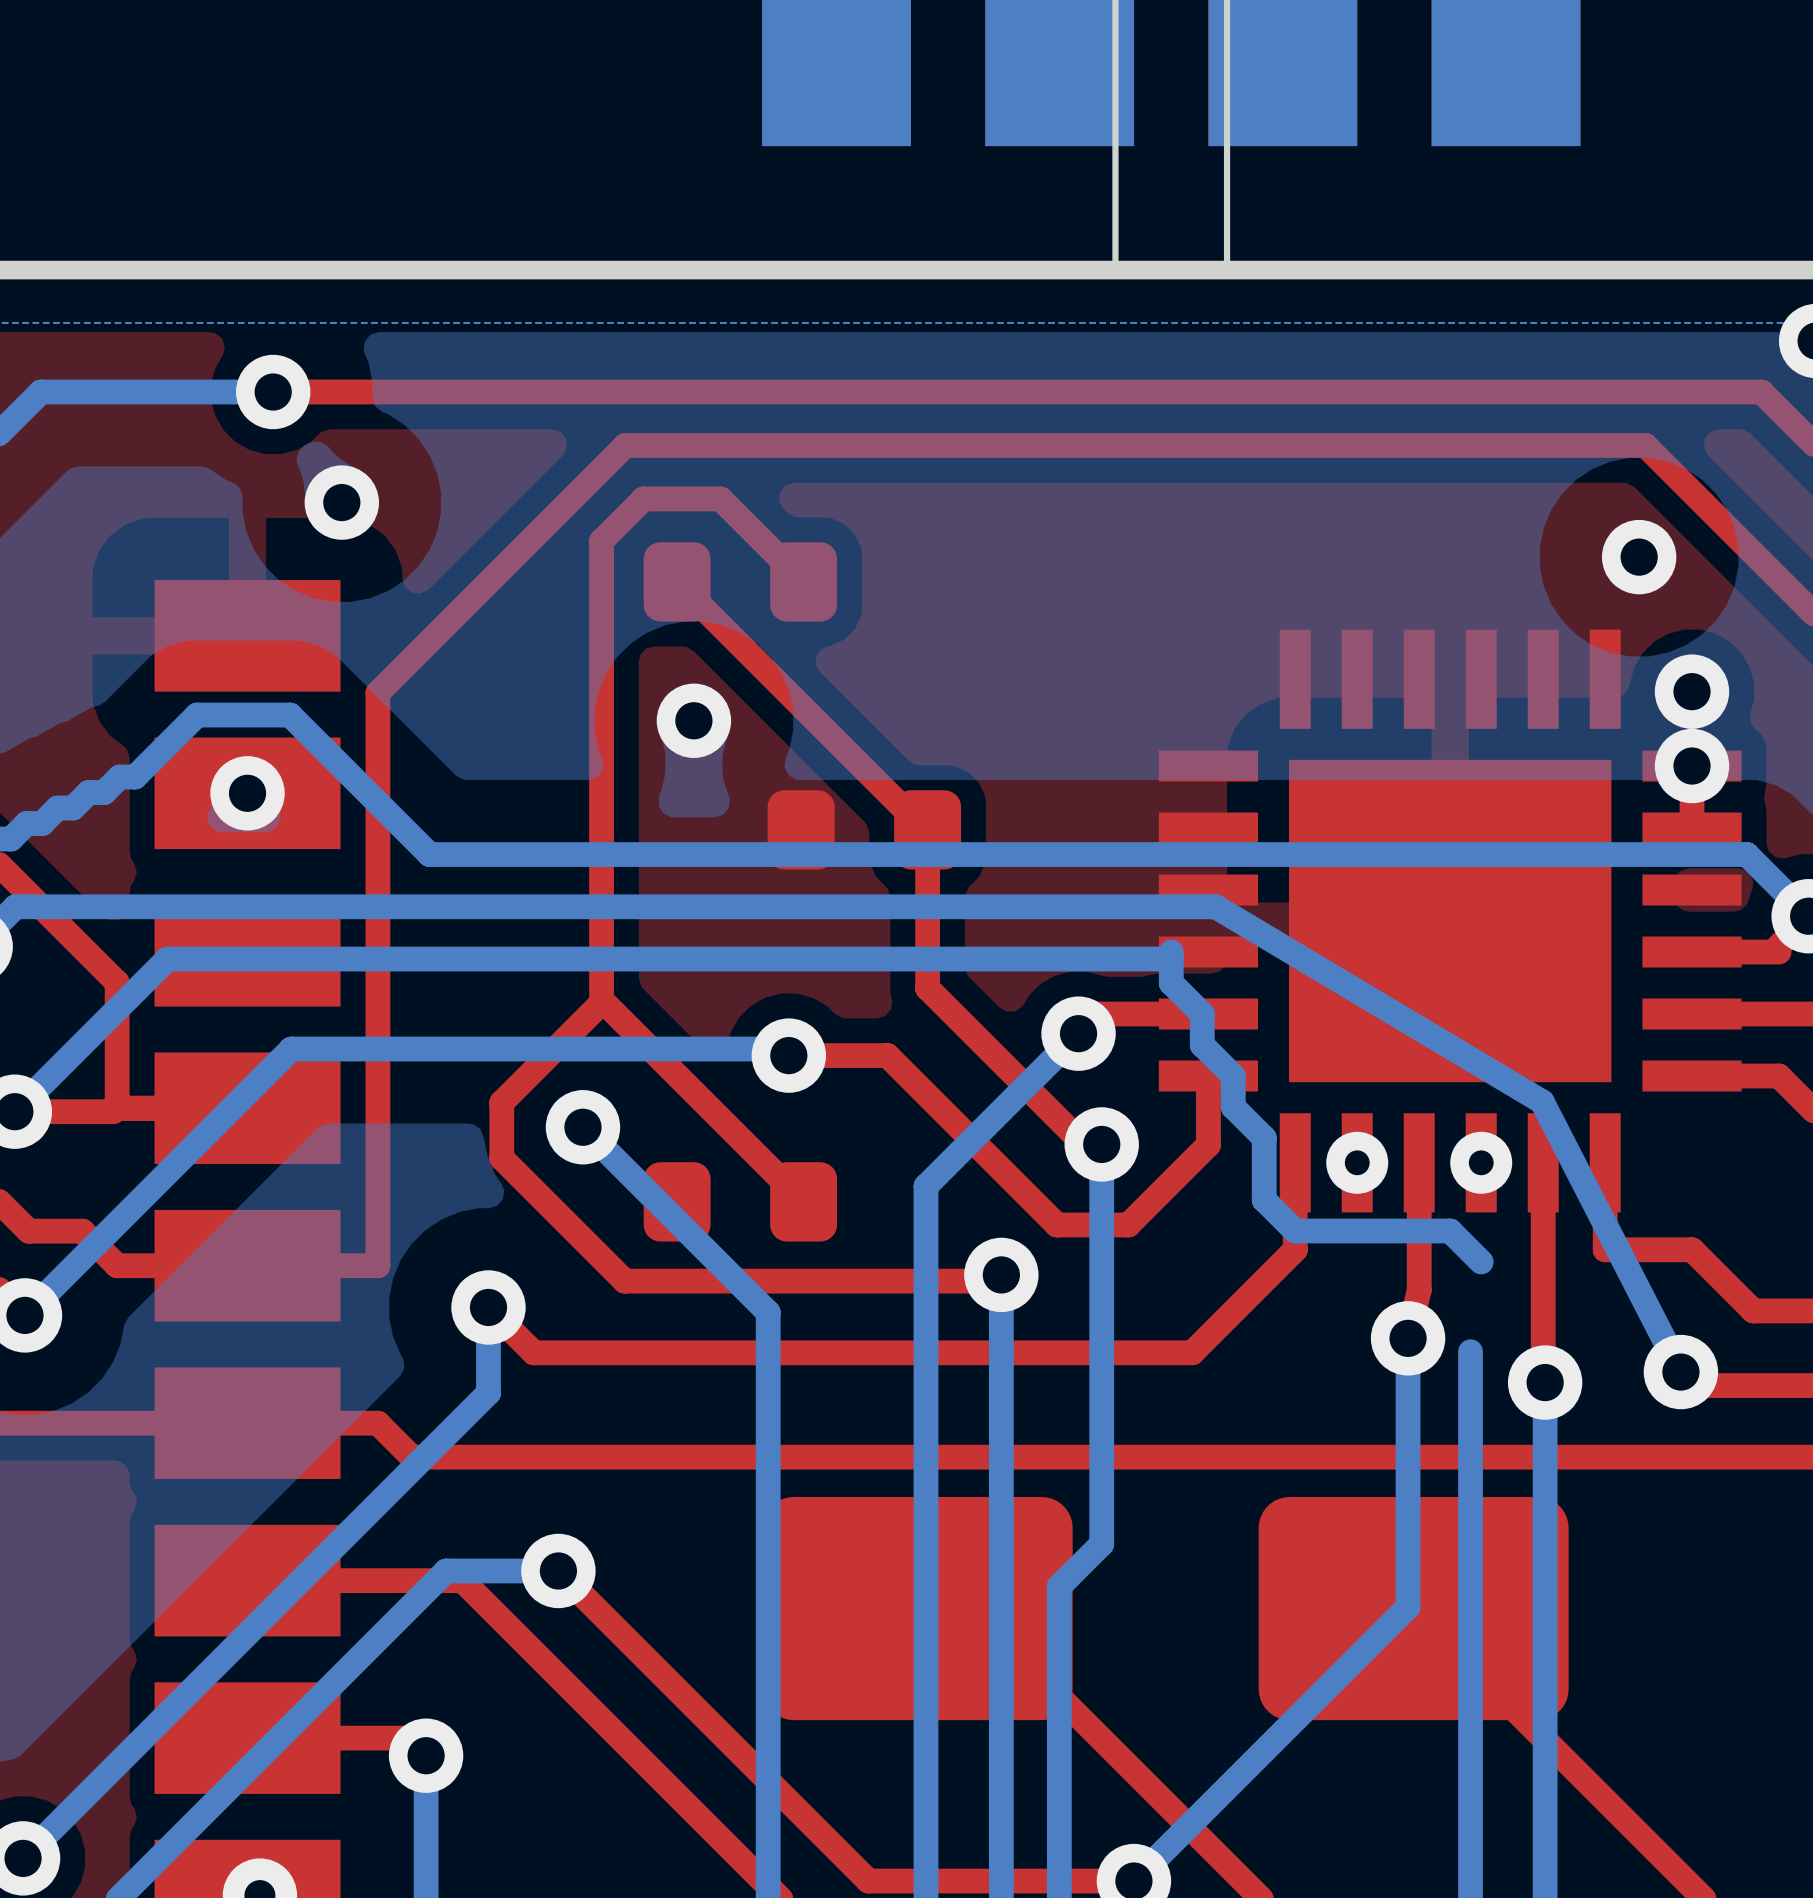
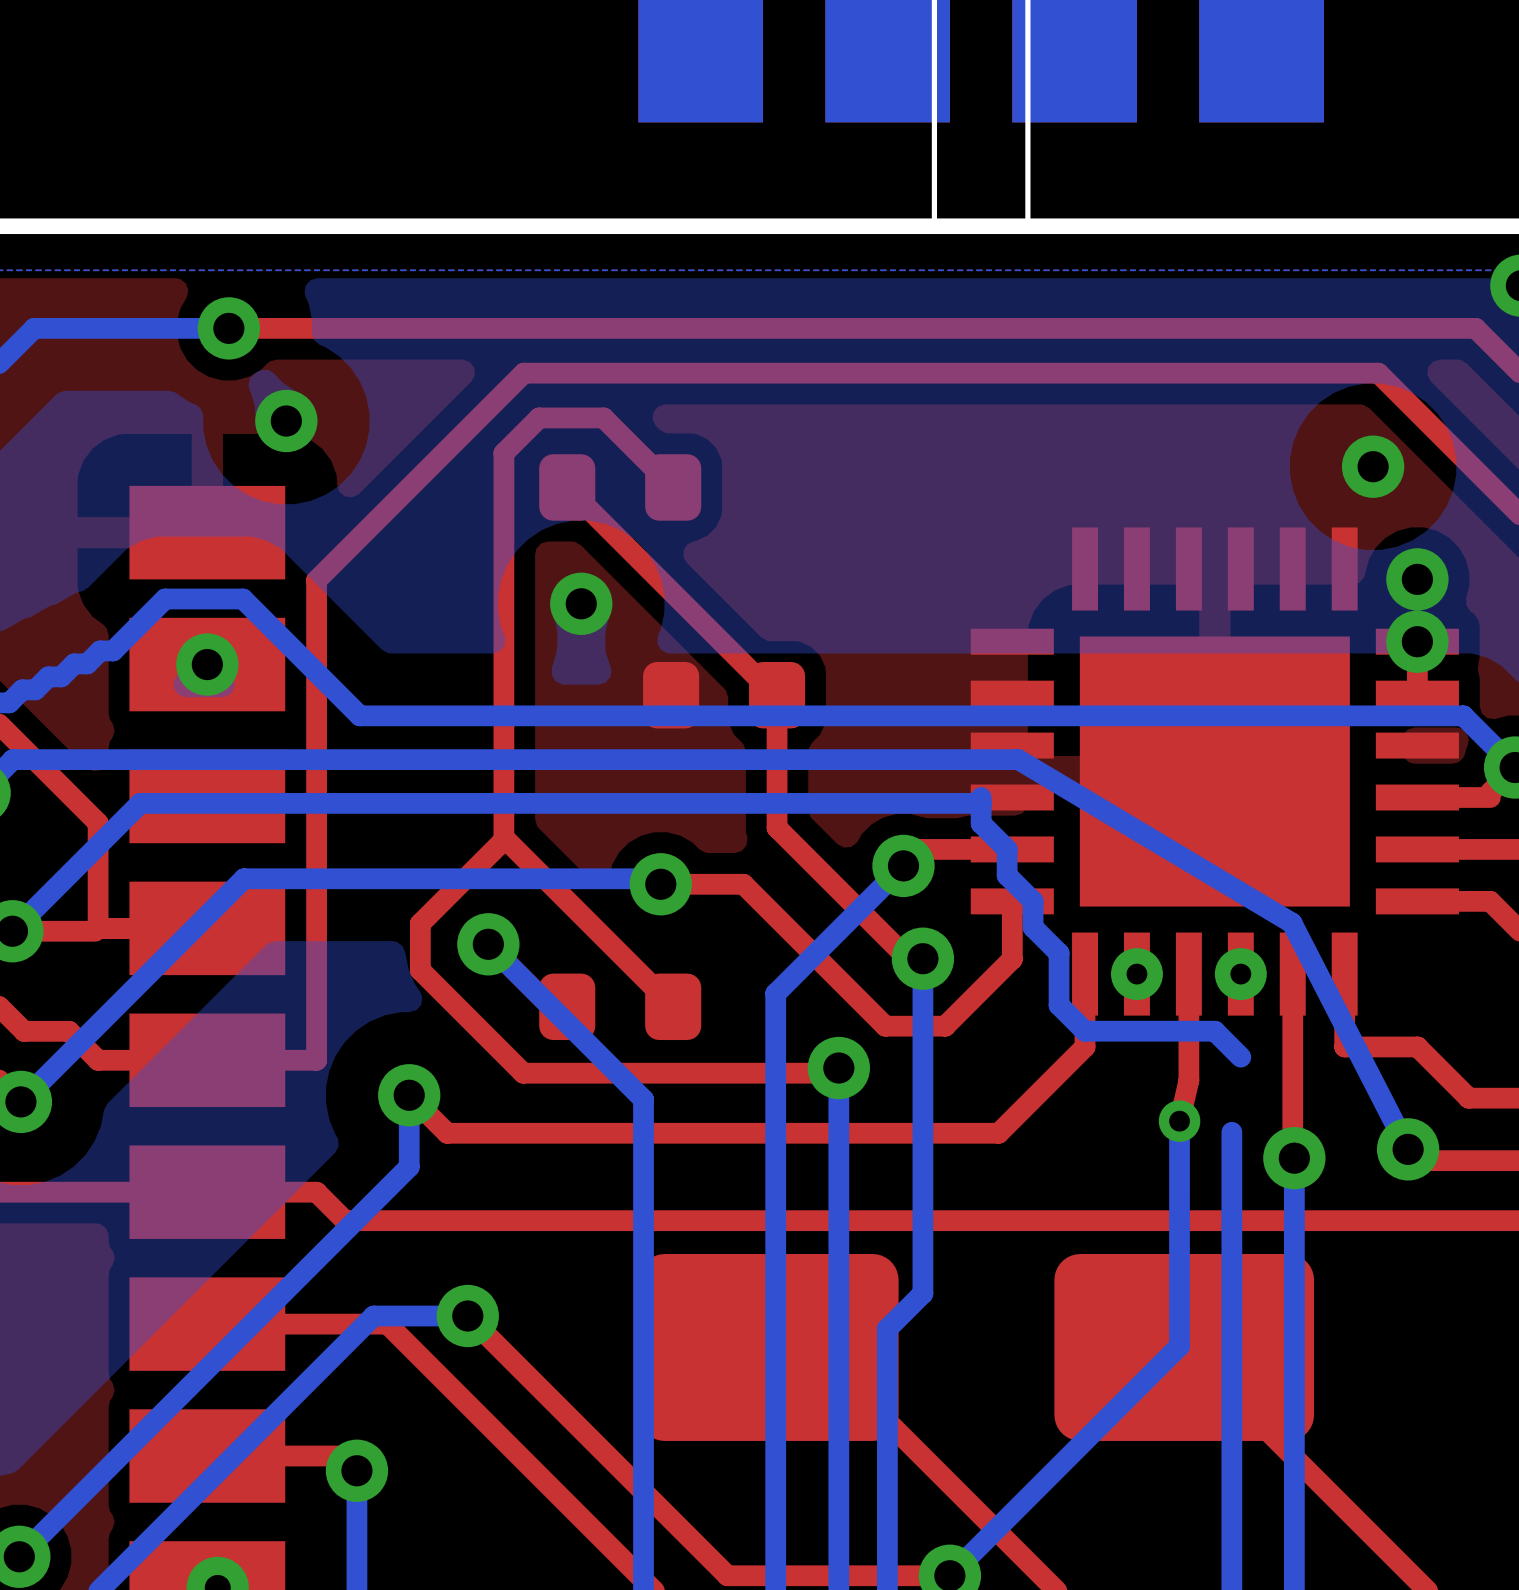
via size: [1370, 1301, 1446, 1376] -> [1158, 1100, 1201, 1142]

